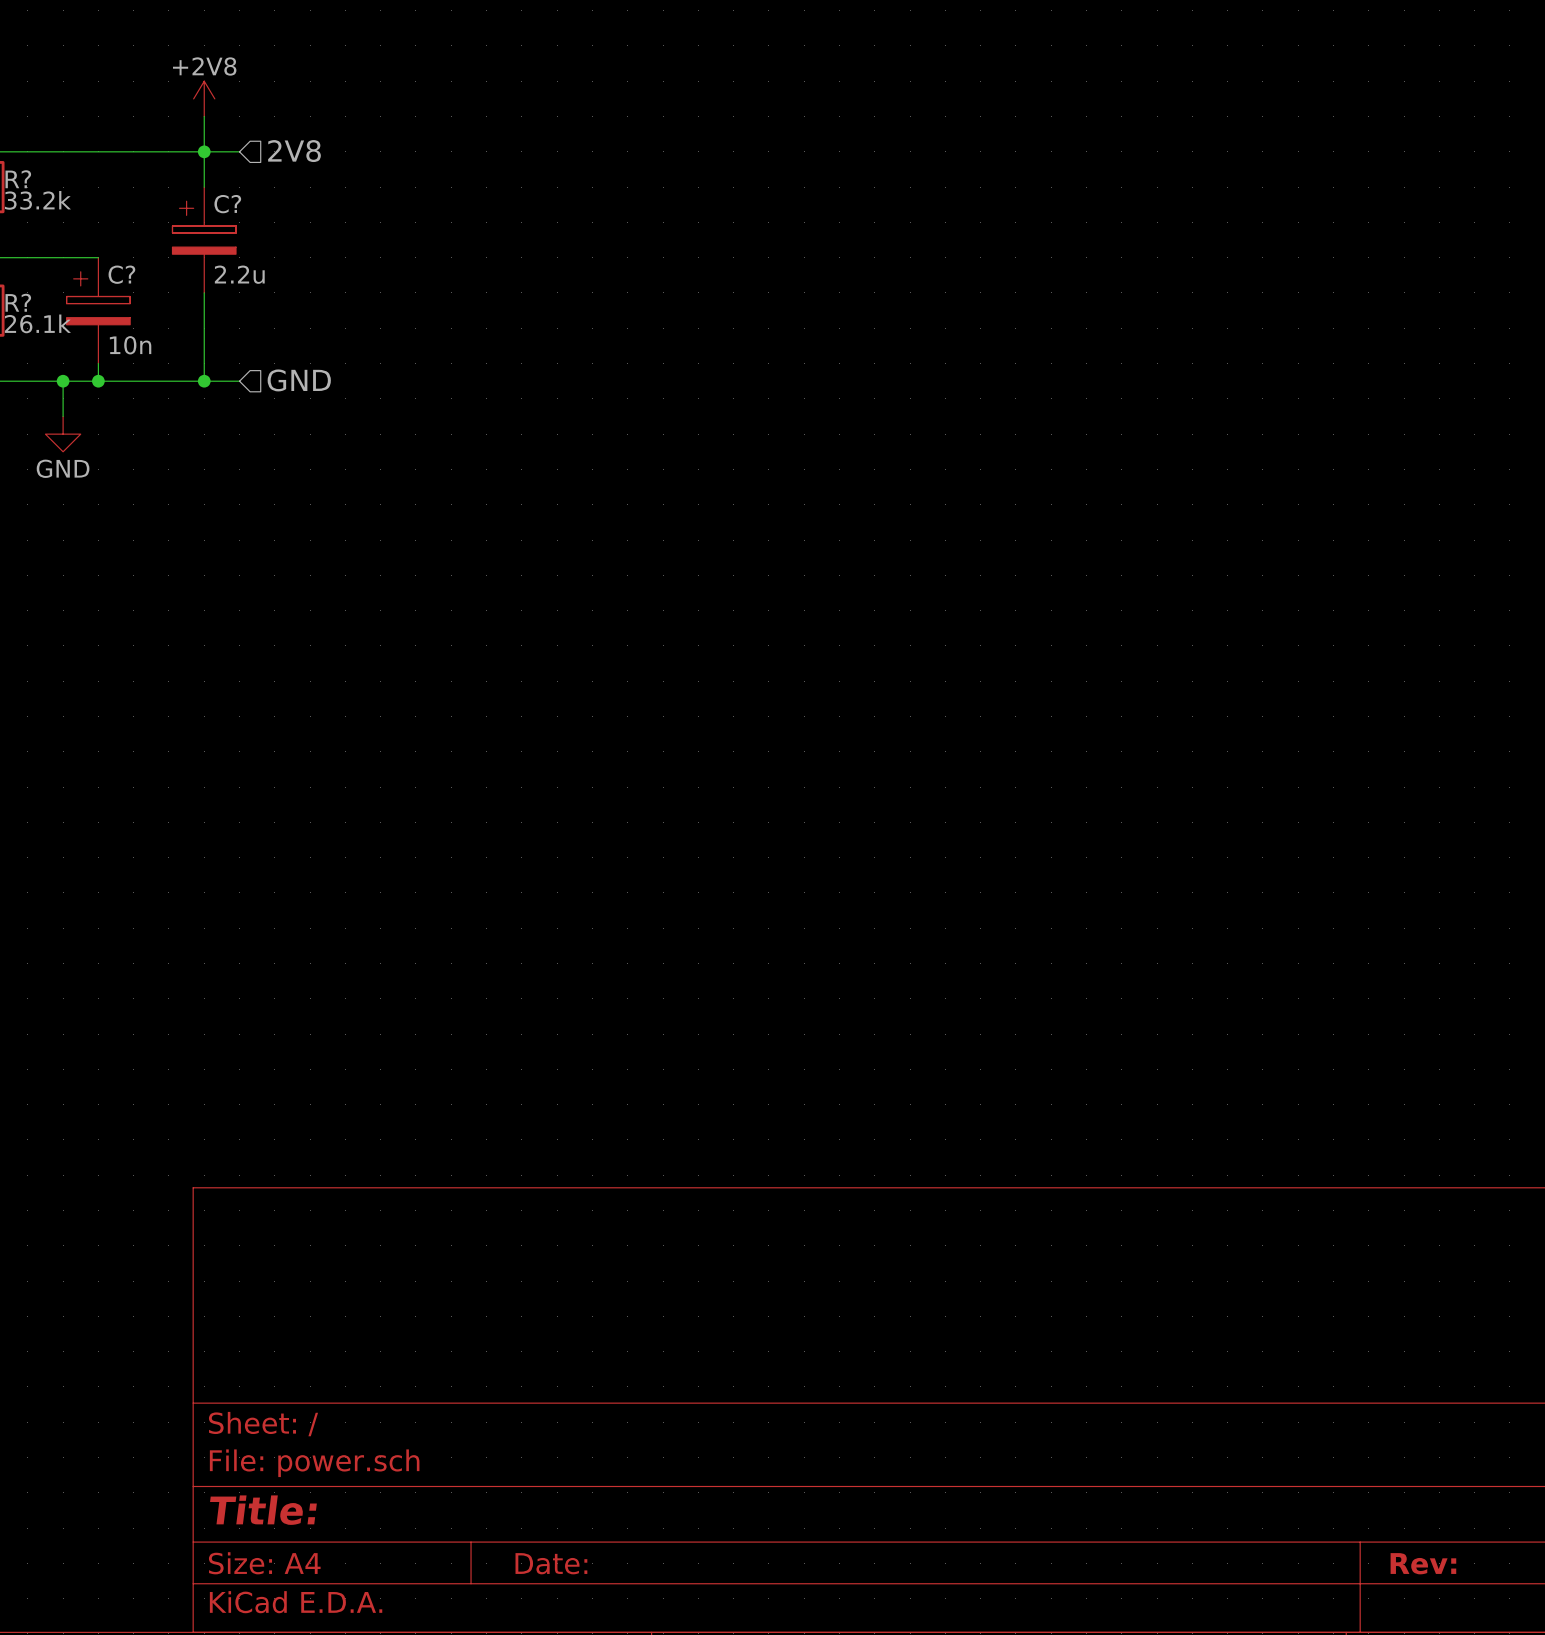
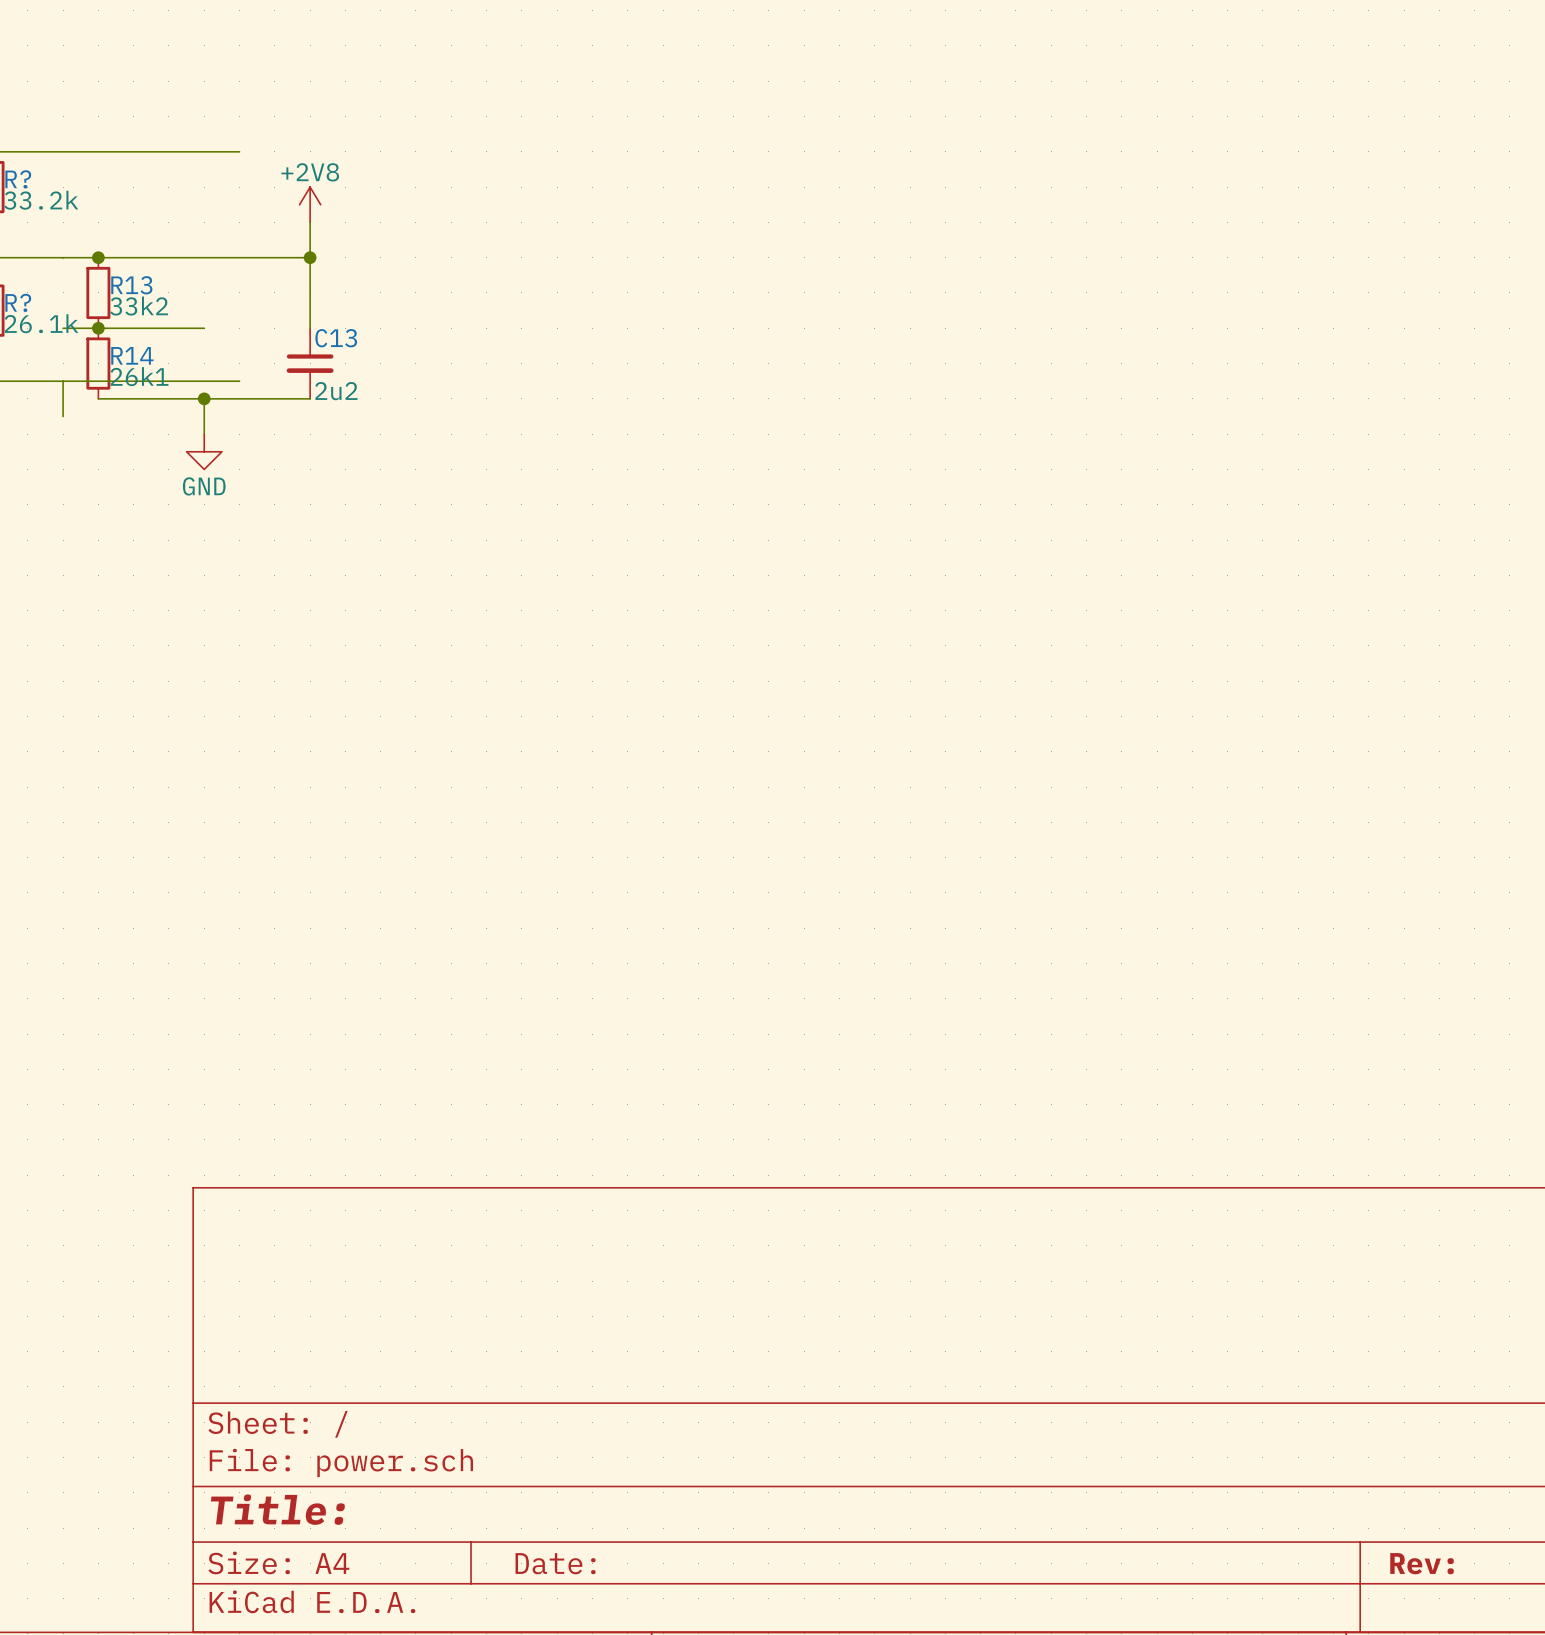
power symbol position: +2V8 (204, 98) -> +2V8 (310, 204)
wire: (204, 116) (204, 187) -> none
junction: (204, 151) -> none
hierarchical label: 2V8 (294, 151) -> none
wire: none -> (310, 222) (310, 328)
C?: 2.2u (204, 240) -> none
wire: none -> (98, 257) (310, 257)
junction: none -> (98, 257)
junction: none -> (310, 257)
R13: none -> 33k2 (98, 292)
wire: (204, 292) (204, 381) -> none
C?: 10n (98, 310) -> none
wire: none -> (63, 328) (204, 328)
junction: none -> (98, 328)
wire: (98, 363) (98, 381) -> none
R14: none -> 26k1 (98, 363)
C13: none -> 2u2 (310, 363)
hierarchical label: GND (299, 380) -> none
junction: (63, 381) -> none
junction: (98, 381) -> none
junction position: (204, 381) -> (204, 398)
wire: none -> (98, 398) (310, 398)
wire: none -> (204, 398) (204, 434)
power symbol: GND (63, 434) -> none
power symbol: none -> GND (204, 451)

